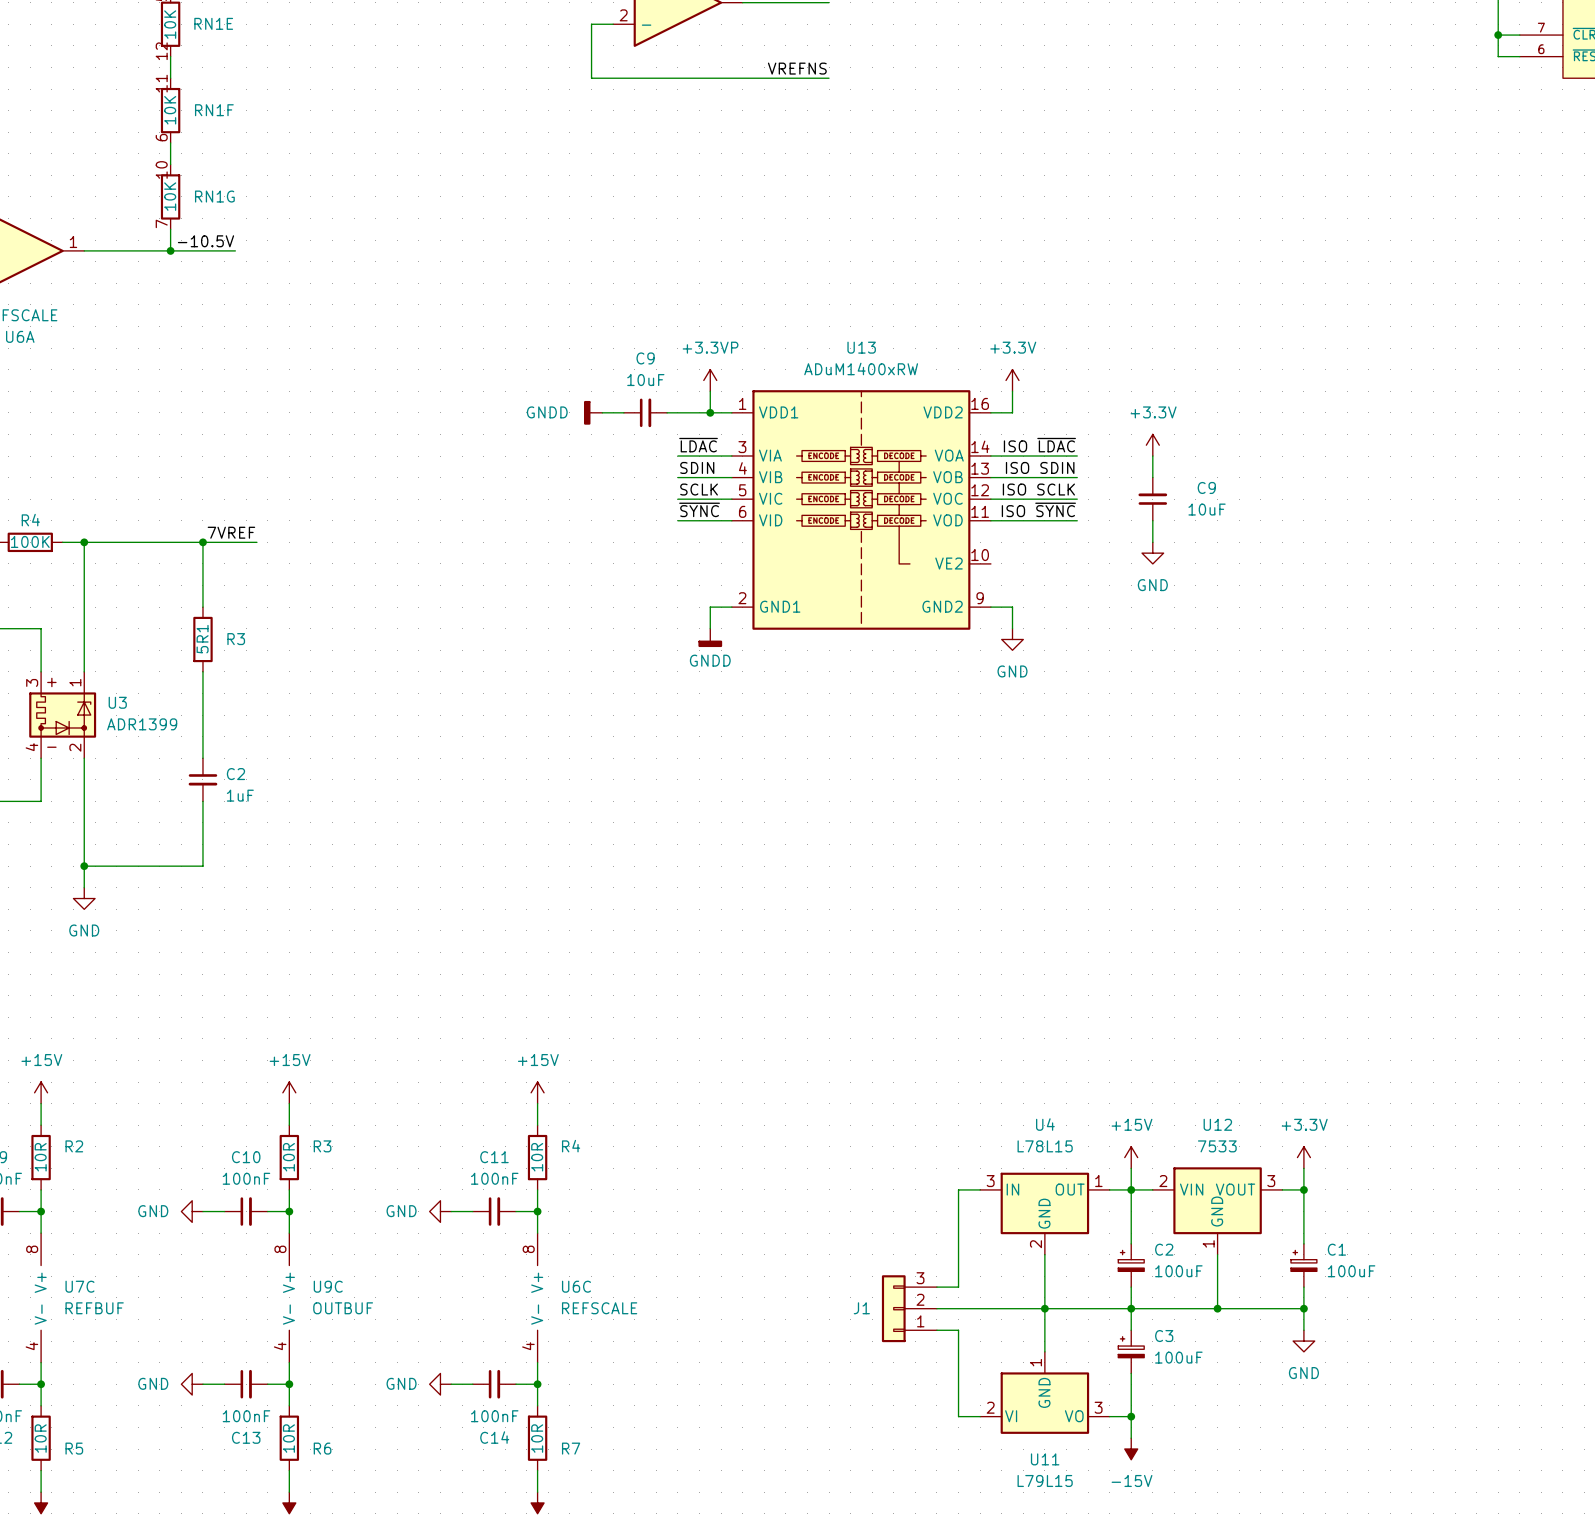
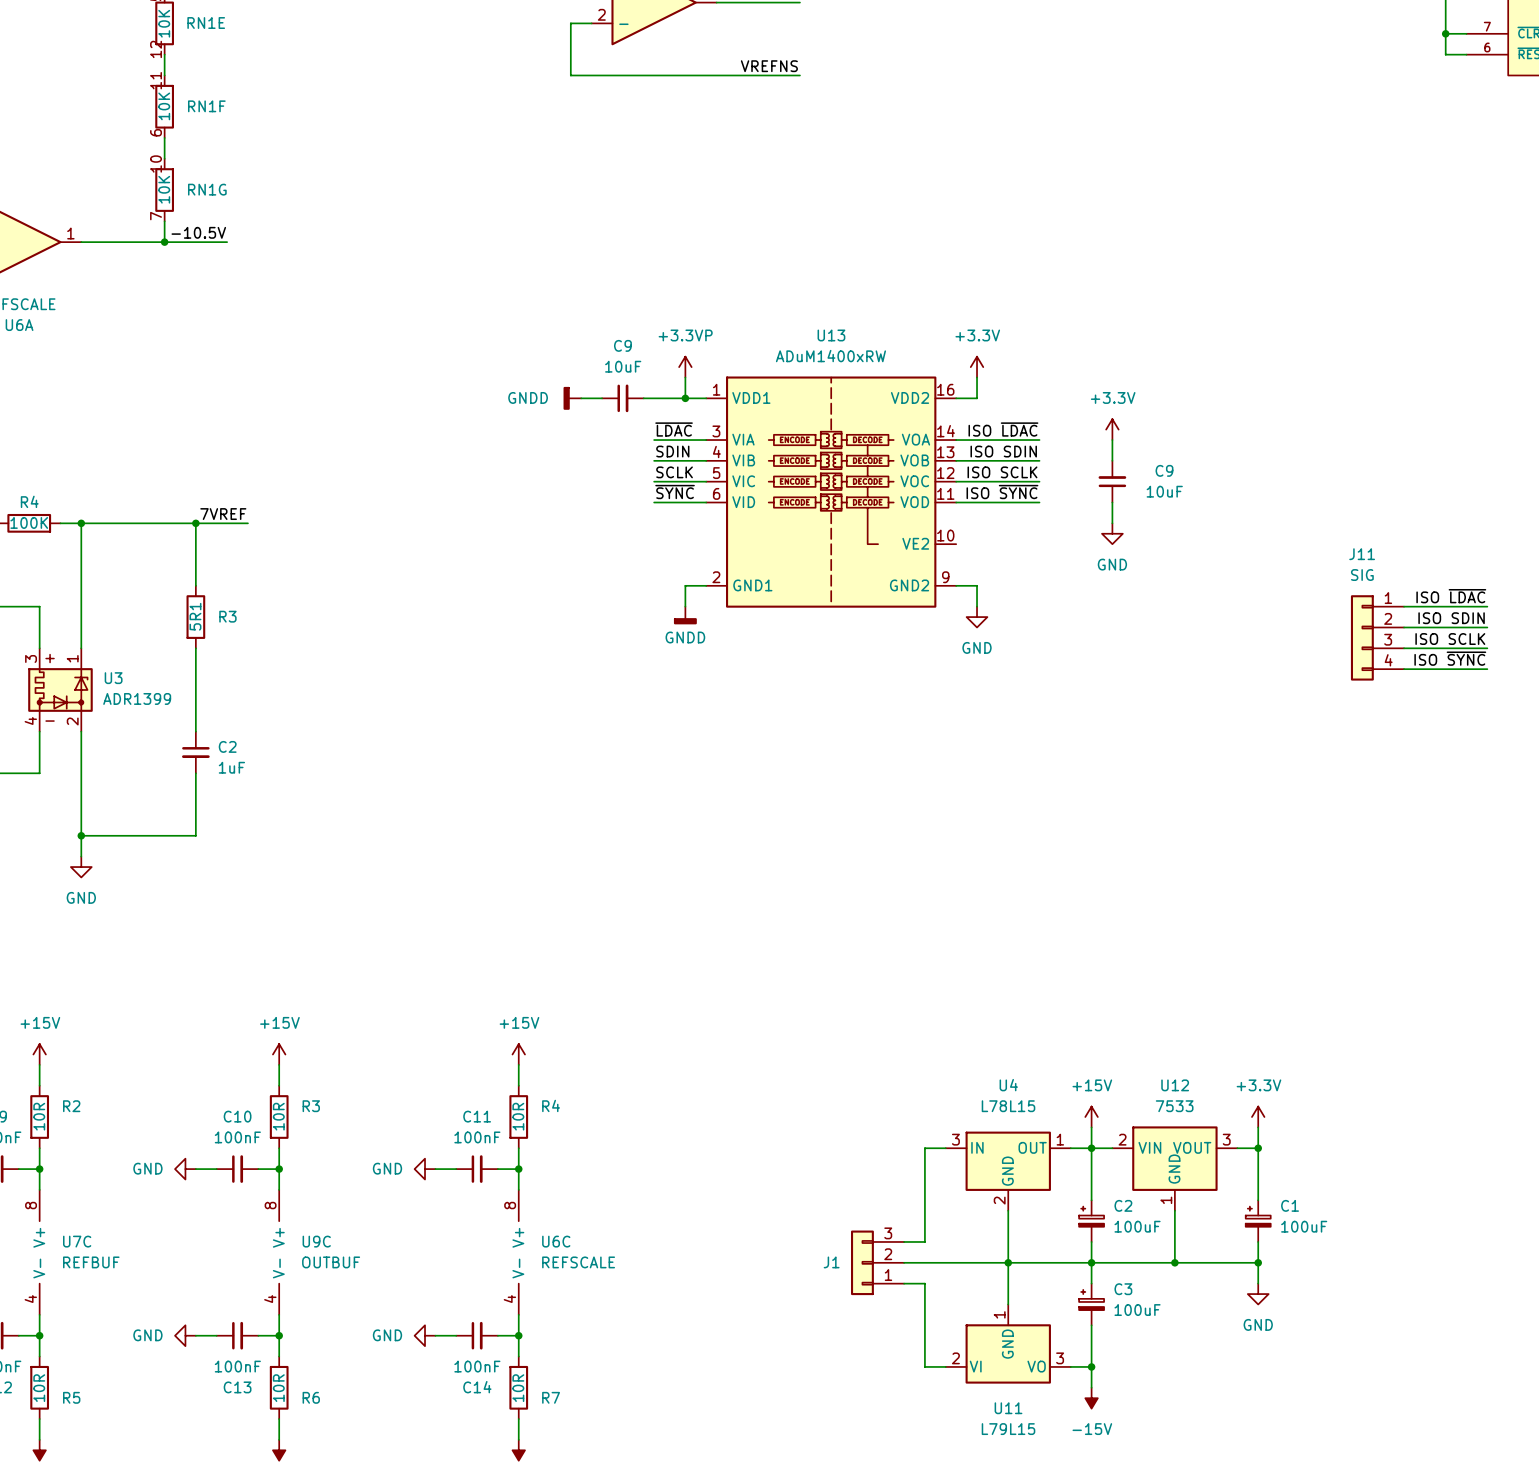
label: none -> ISO ~{LDAC} (1451, 596)
wire: none -> (1404, 606) (1487, 606)
label: none -> ISO SDIN (1451, 618)
wire: none -> (1404, 627) (1487, 627)
J11: none -> SIG (1377, 637)
label: none -> ISO SCLK (1450, 639)
wire: none -> (1404, 648) (1487, 648)
label: none -> ISO ~{SYNC} (1450, 658)
wire: none -> (1404, 669) (1487, 669)

